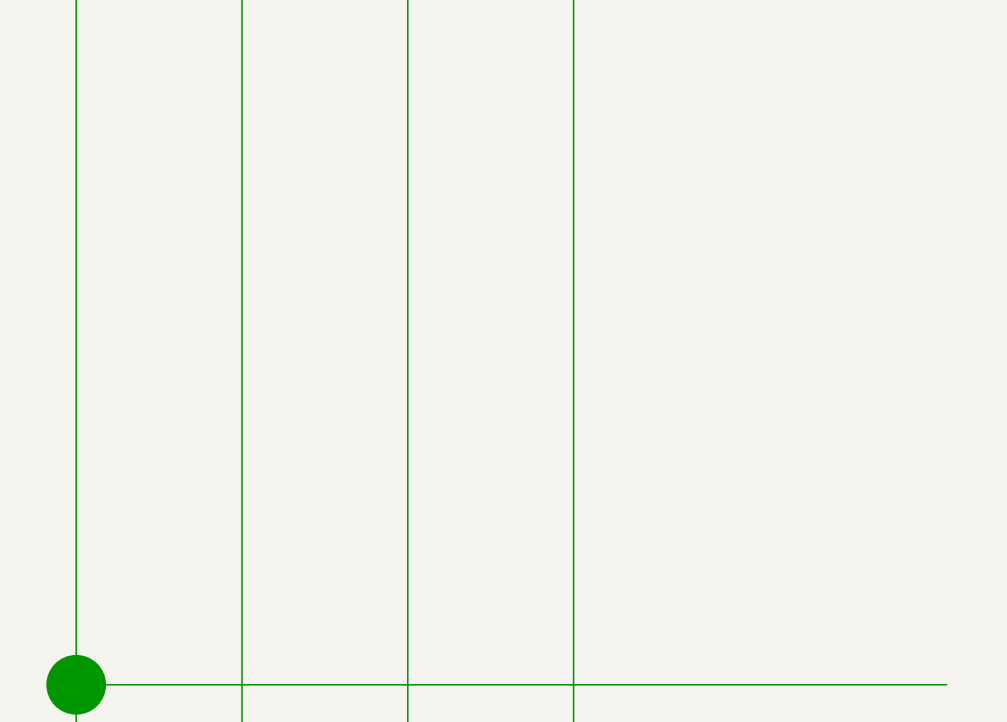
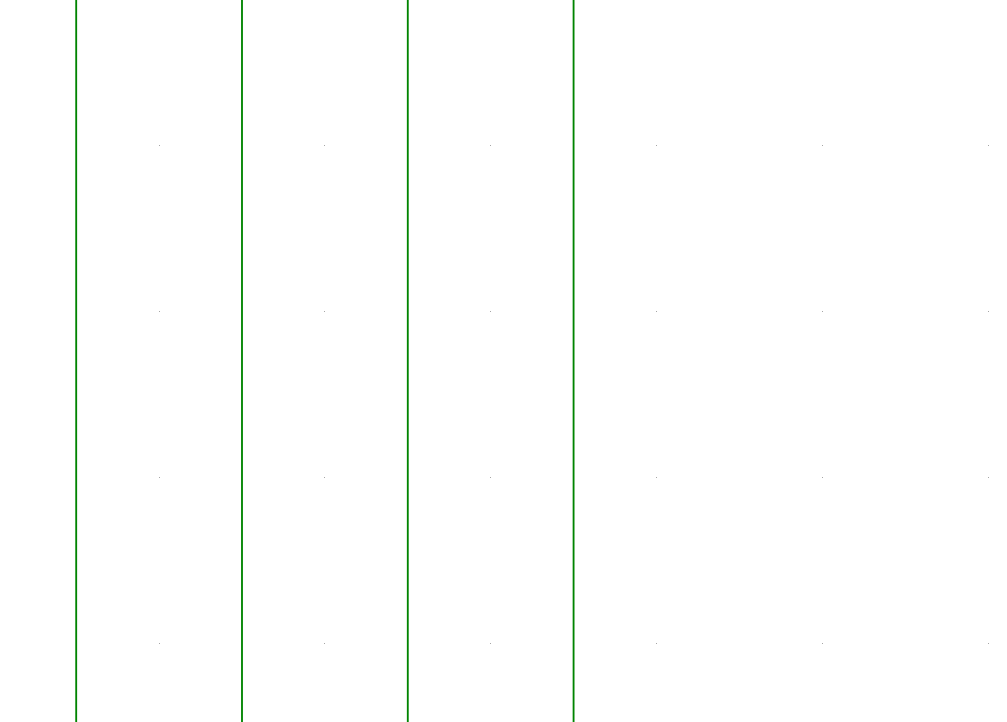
wire: (76, 684) (946, 684) -> none
junction: (76, 684) -> none

